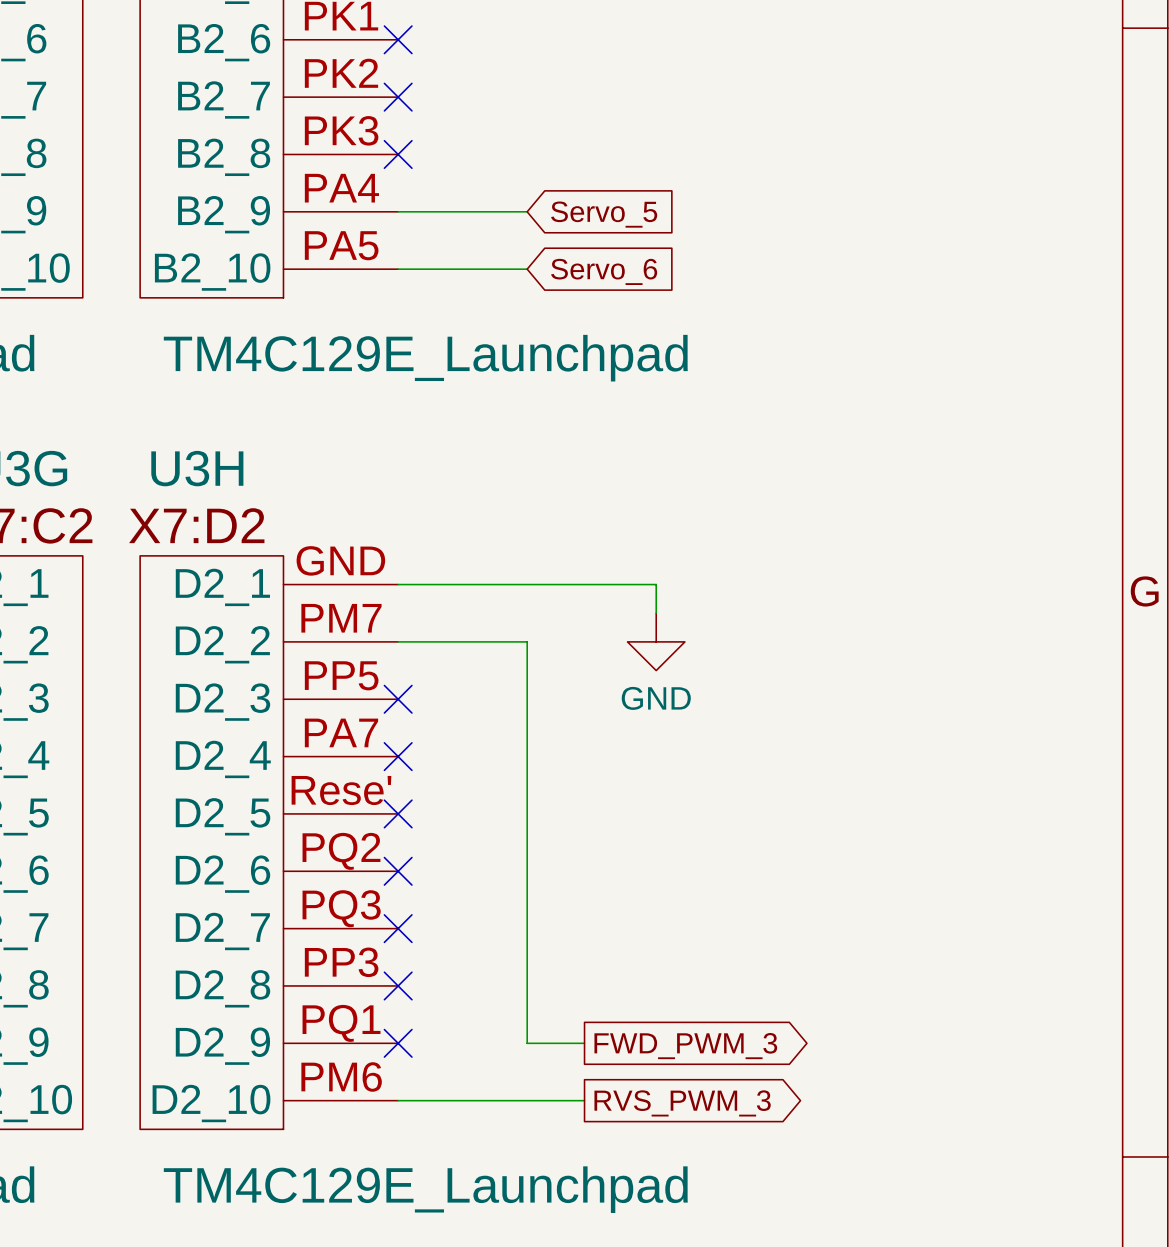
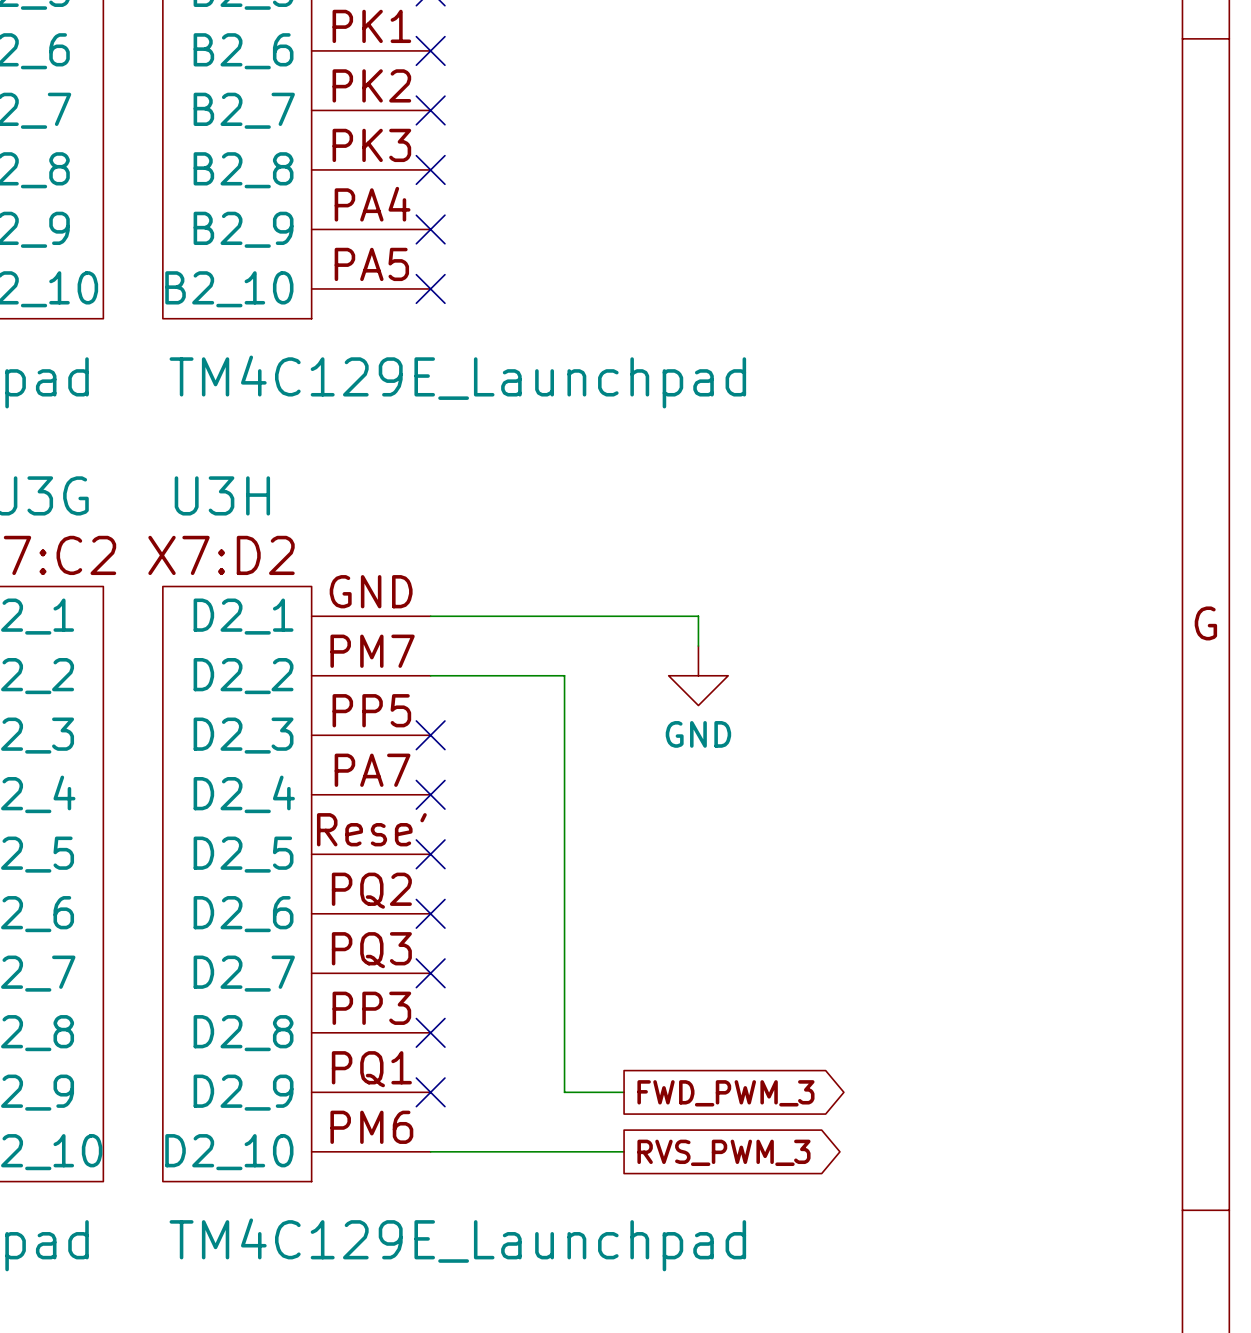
wire: (398, 211) (527, 211) -> none
no-connect mark: none -> (430, 229)
global label: Servo_5 (604, 214) -> none
wire: (398, 269) (527, 269) -> none
no-connect mark: none -> (430, 288)
global label: Servo_6 (604, 271) -> none

